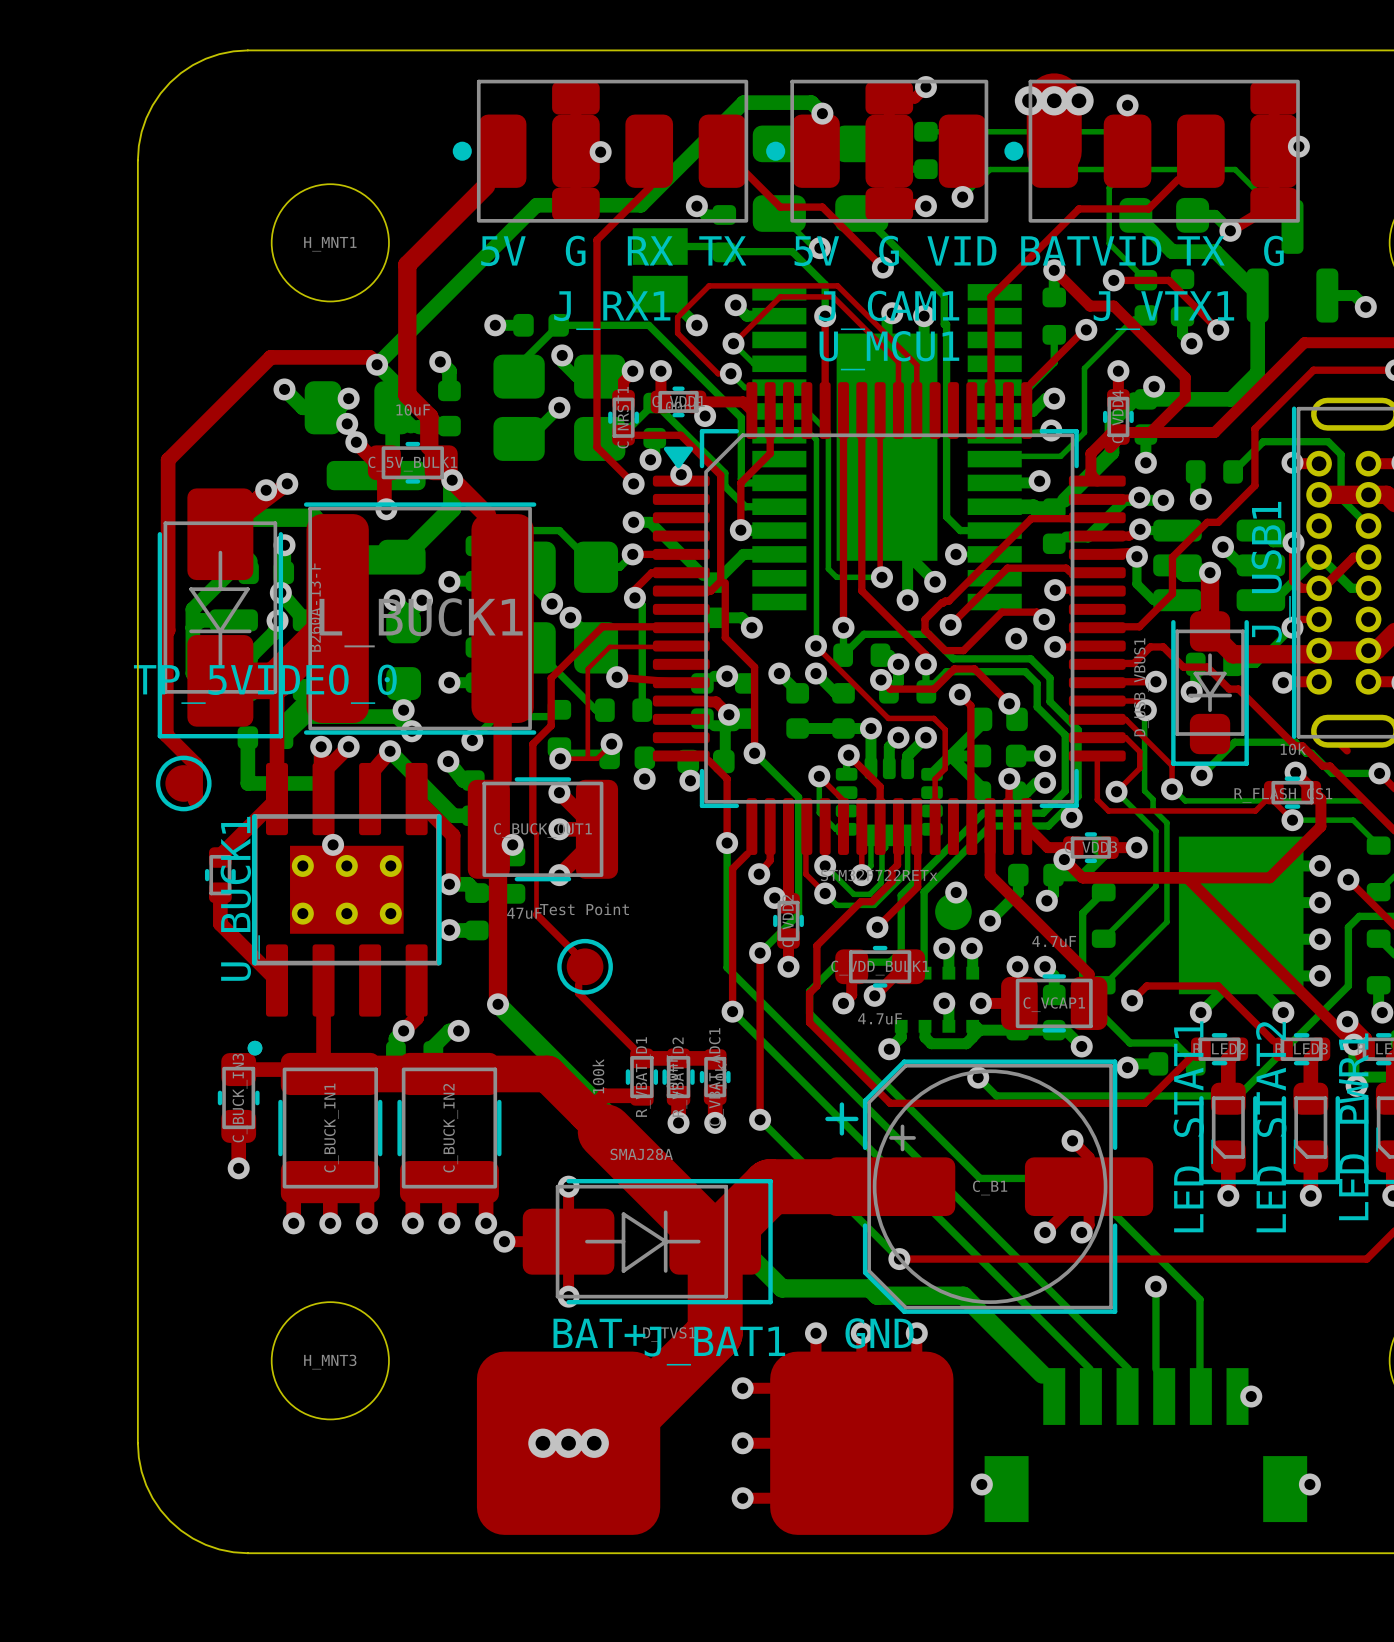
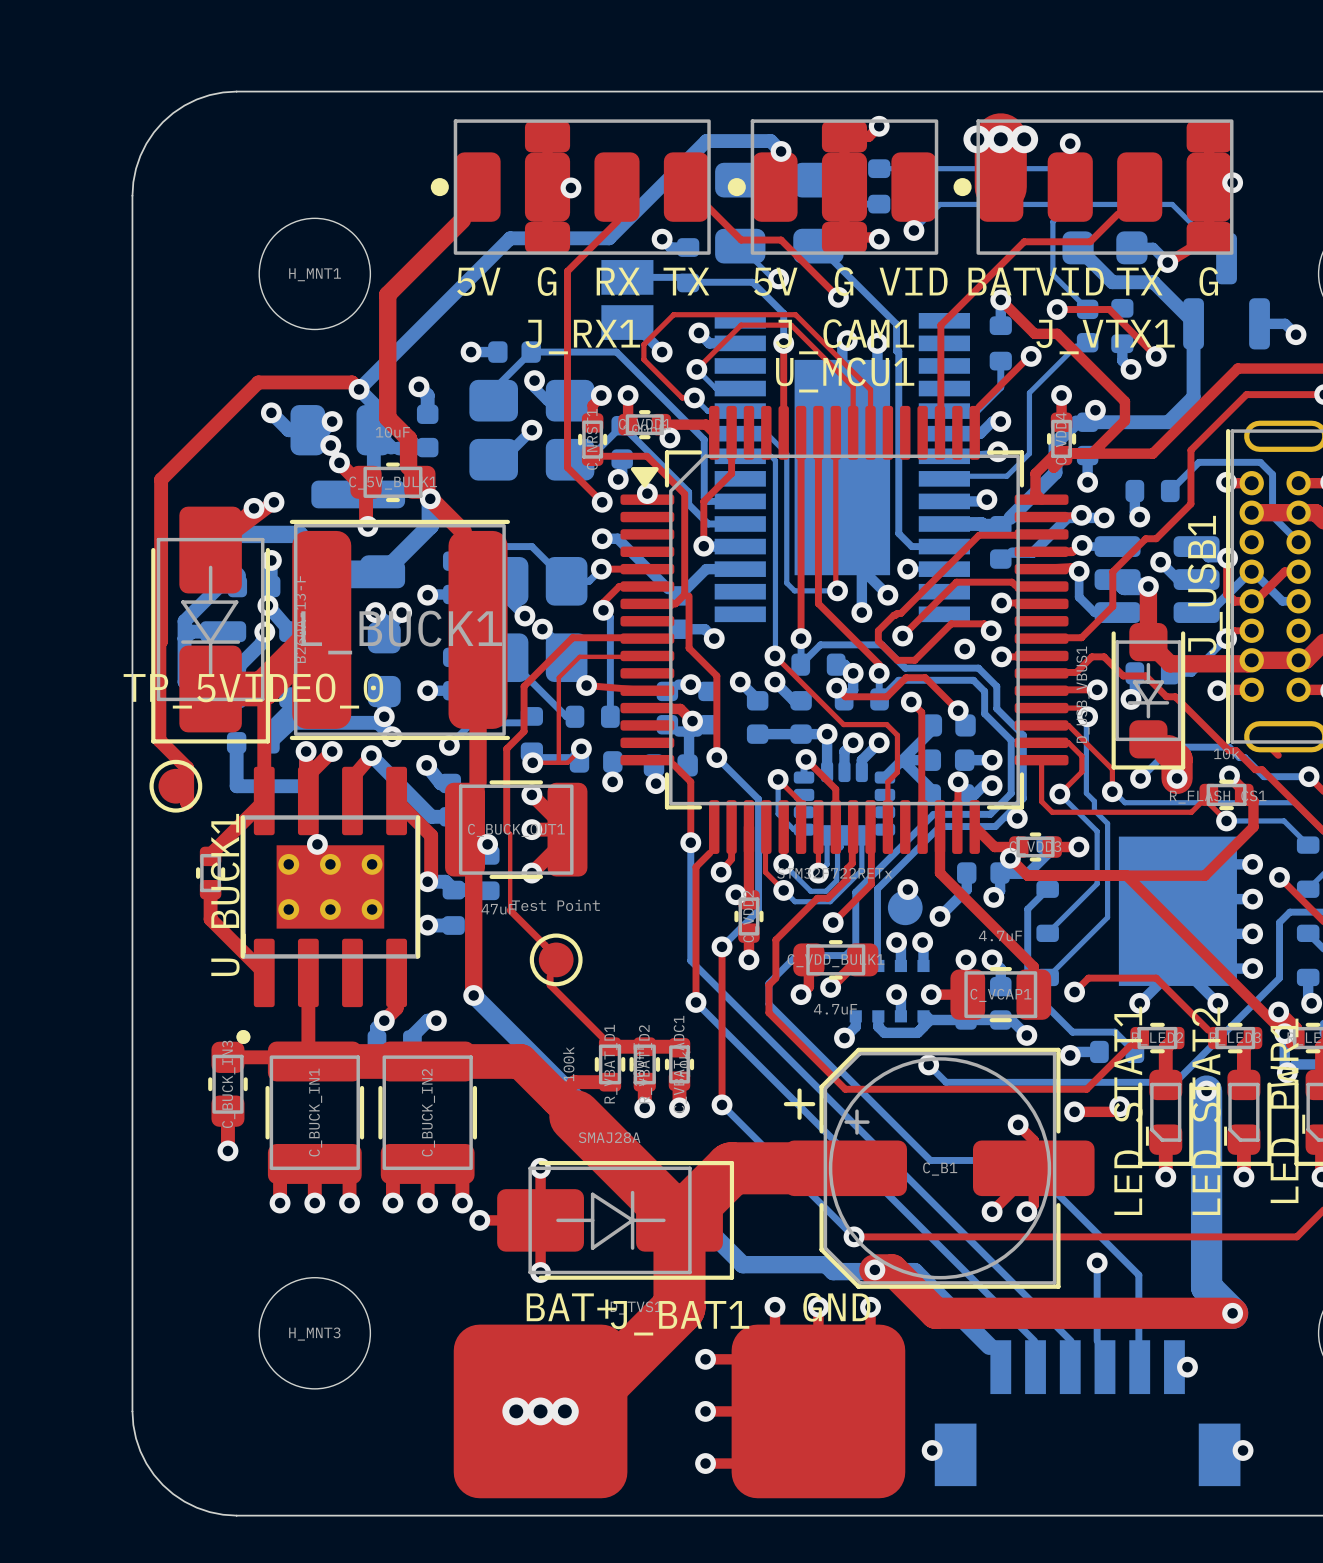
top track: none -> (1168, 750) (1177, 759) (1177, 778)
via: none -> (1177, 778)
bottom track: none -> (1206, 1091) (1206, 1287) (1232, 1313)
via: none -> (1206, 1091)
top track: none -> (1119, 1106) (1114, 1111) (1074, 1111)
via: none -> (1119, 1106)
via: none -> (1074, 1111)
top track: none -> (874, 1269) (892, 1269) (935, 1313) (1232, 1313)
via: none -> (874, 1269)
via: none -> (1232, 1313)

